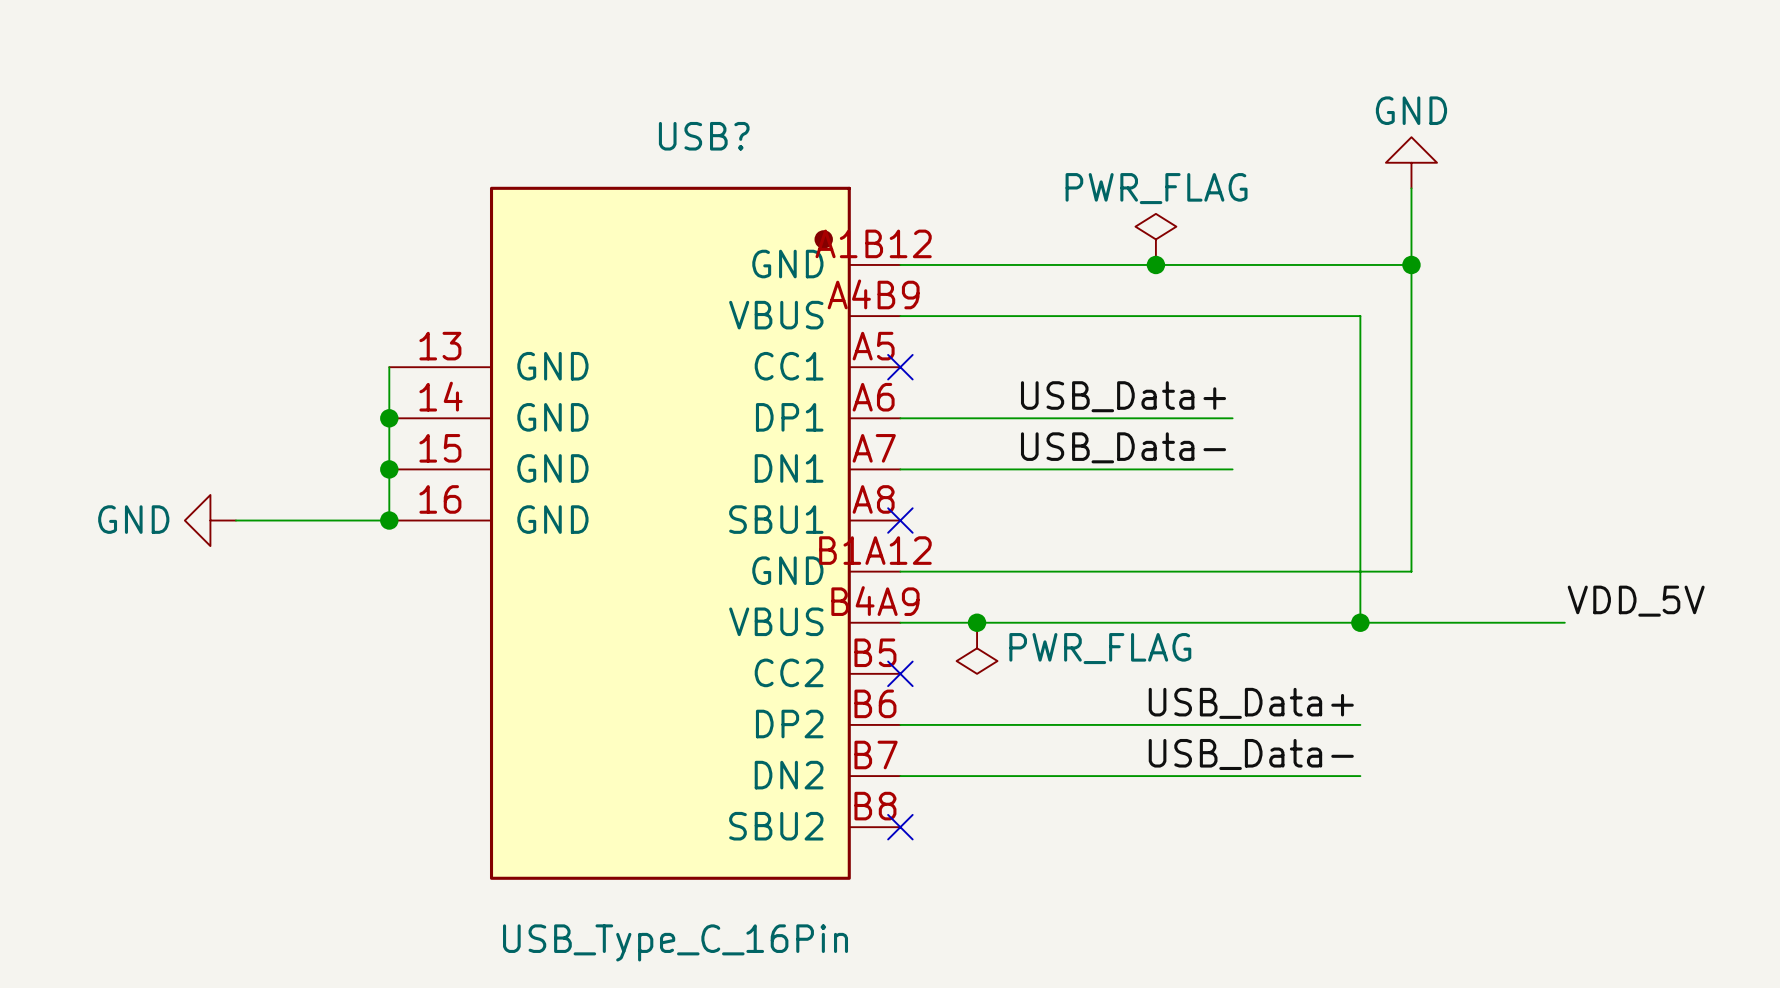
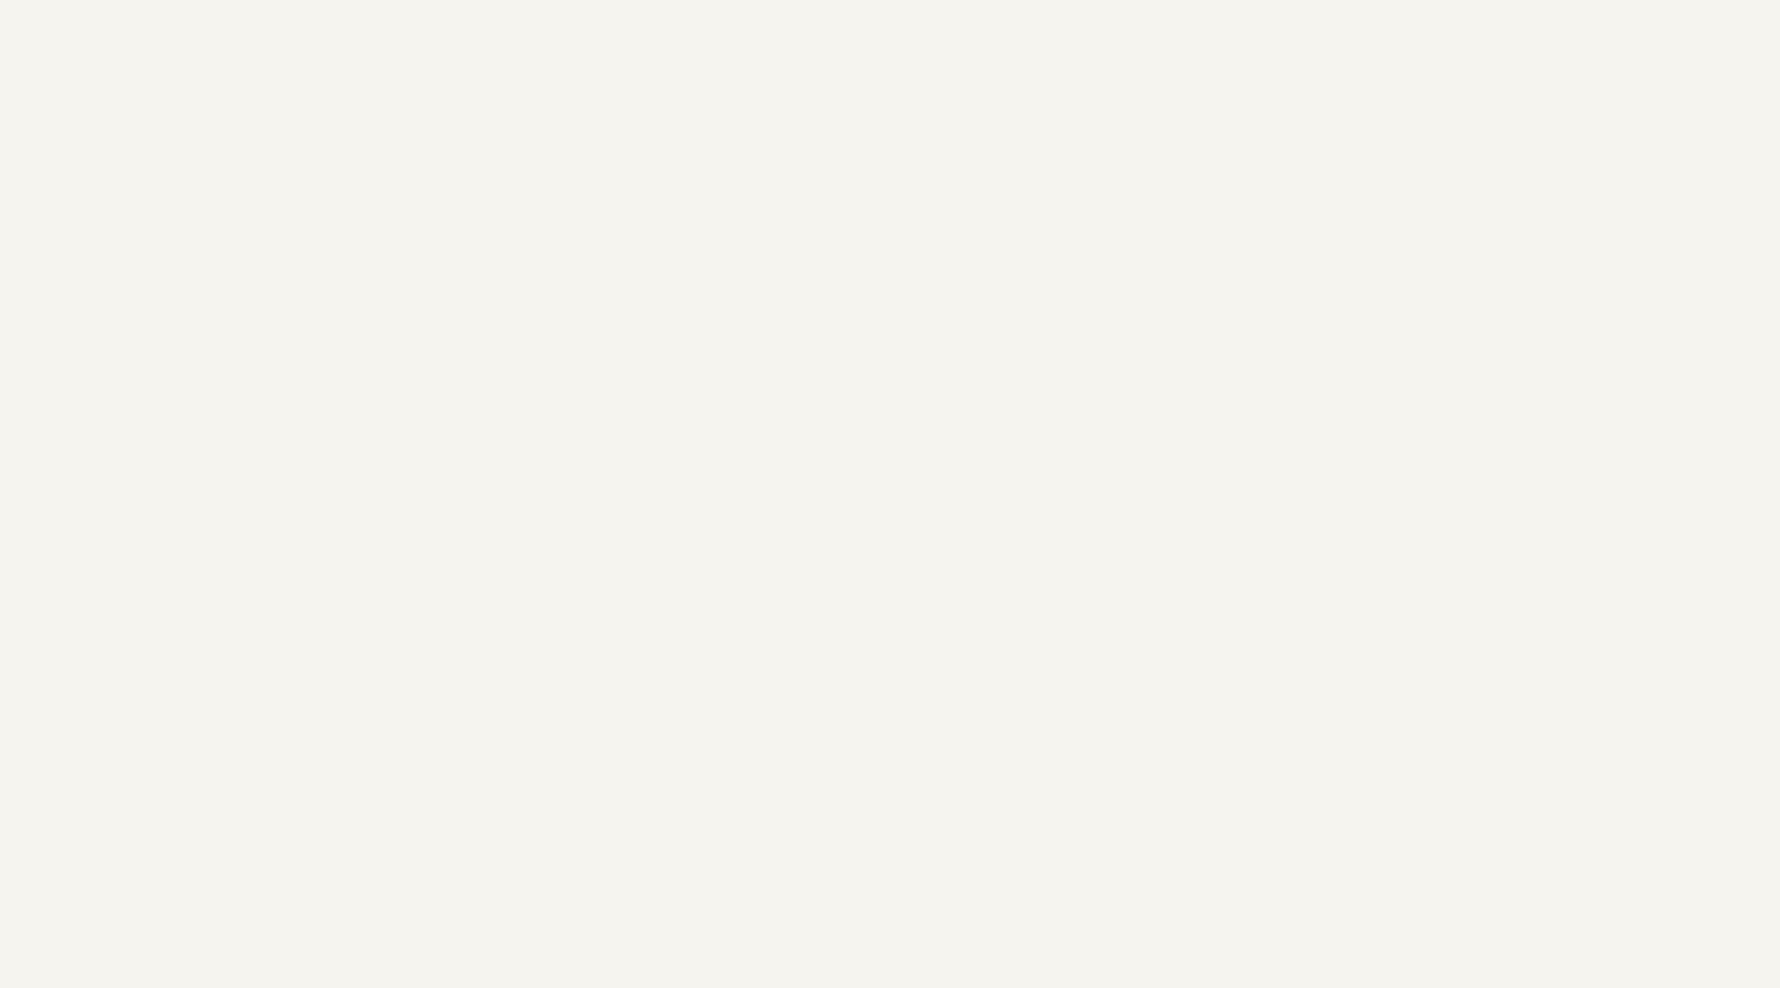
power symbol: GND (1411, 162) -> none
wire: (1411, 188) (1411, 571) (900, 571) -> none
power symbol: PWR_FLAG (1155, 239) -> none
wire: (900, 264) (1411, 264) -> none
junction: (1155, 264) -> none
junction: (1411, 264) -> none
wire: (900, 316) (1360, 316) (1360, 622) -> none
wire: (389, 367) (389, 520) (235, 520) -> none
no-connect mark: (900, 367) -> none
label: USB_Data+ (1123, 396) -> none
junction: (389, 418) -> none
wire: (900, 418) (1232, 418) -> none
label: USB_Data- (1123, 447) -> none
junction: (389, 469) -> none
wire: (900, 469) (1232, 469) -> none
power symbol: GND (210, 520) -> none
junction: (389, 520) -> none
no-connect mark: (900, 520) -> none
USB?: USB_Type_C_16Pin (644, 533) -> none
label: VDD_5V (1636, 601) -> none
wire: (900, 622) (1564, 622) -> none
junction: (977, 622) -> none
junction: (1360, 622) -> none
power symbol: PWR_FLAG (977, 648) -> none
no-connect mark: (900, 673) -> none
label: USB_Data+ (1251, 703) -> none
wire: (900, 724) (1360, 724) -> none
label: USB_Data- (1251, 754) -> none
wire: (900, 776) (1360, 776) -> none
no-connect mark: (900, 827) -> none

